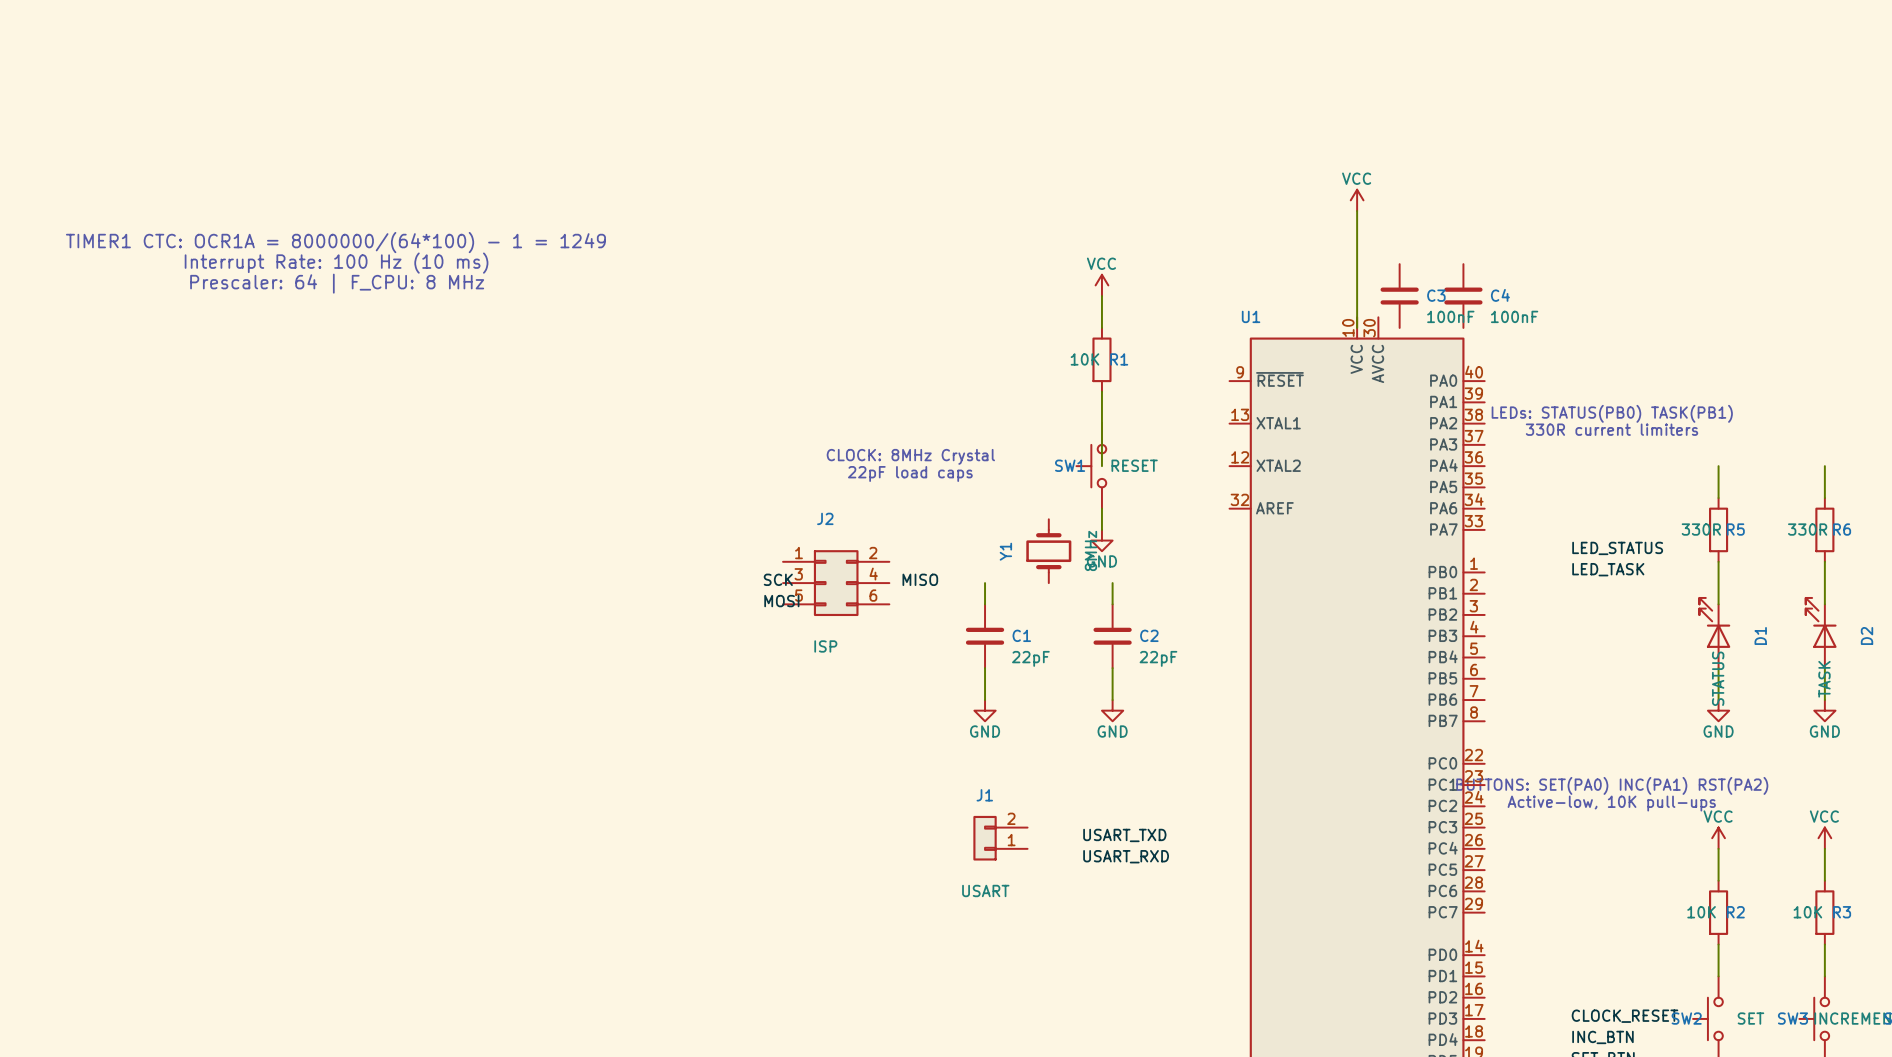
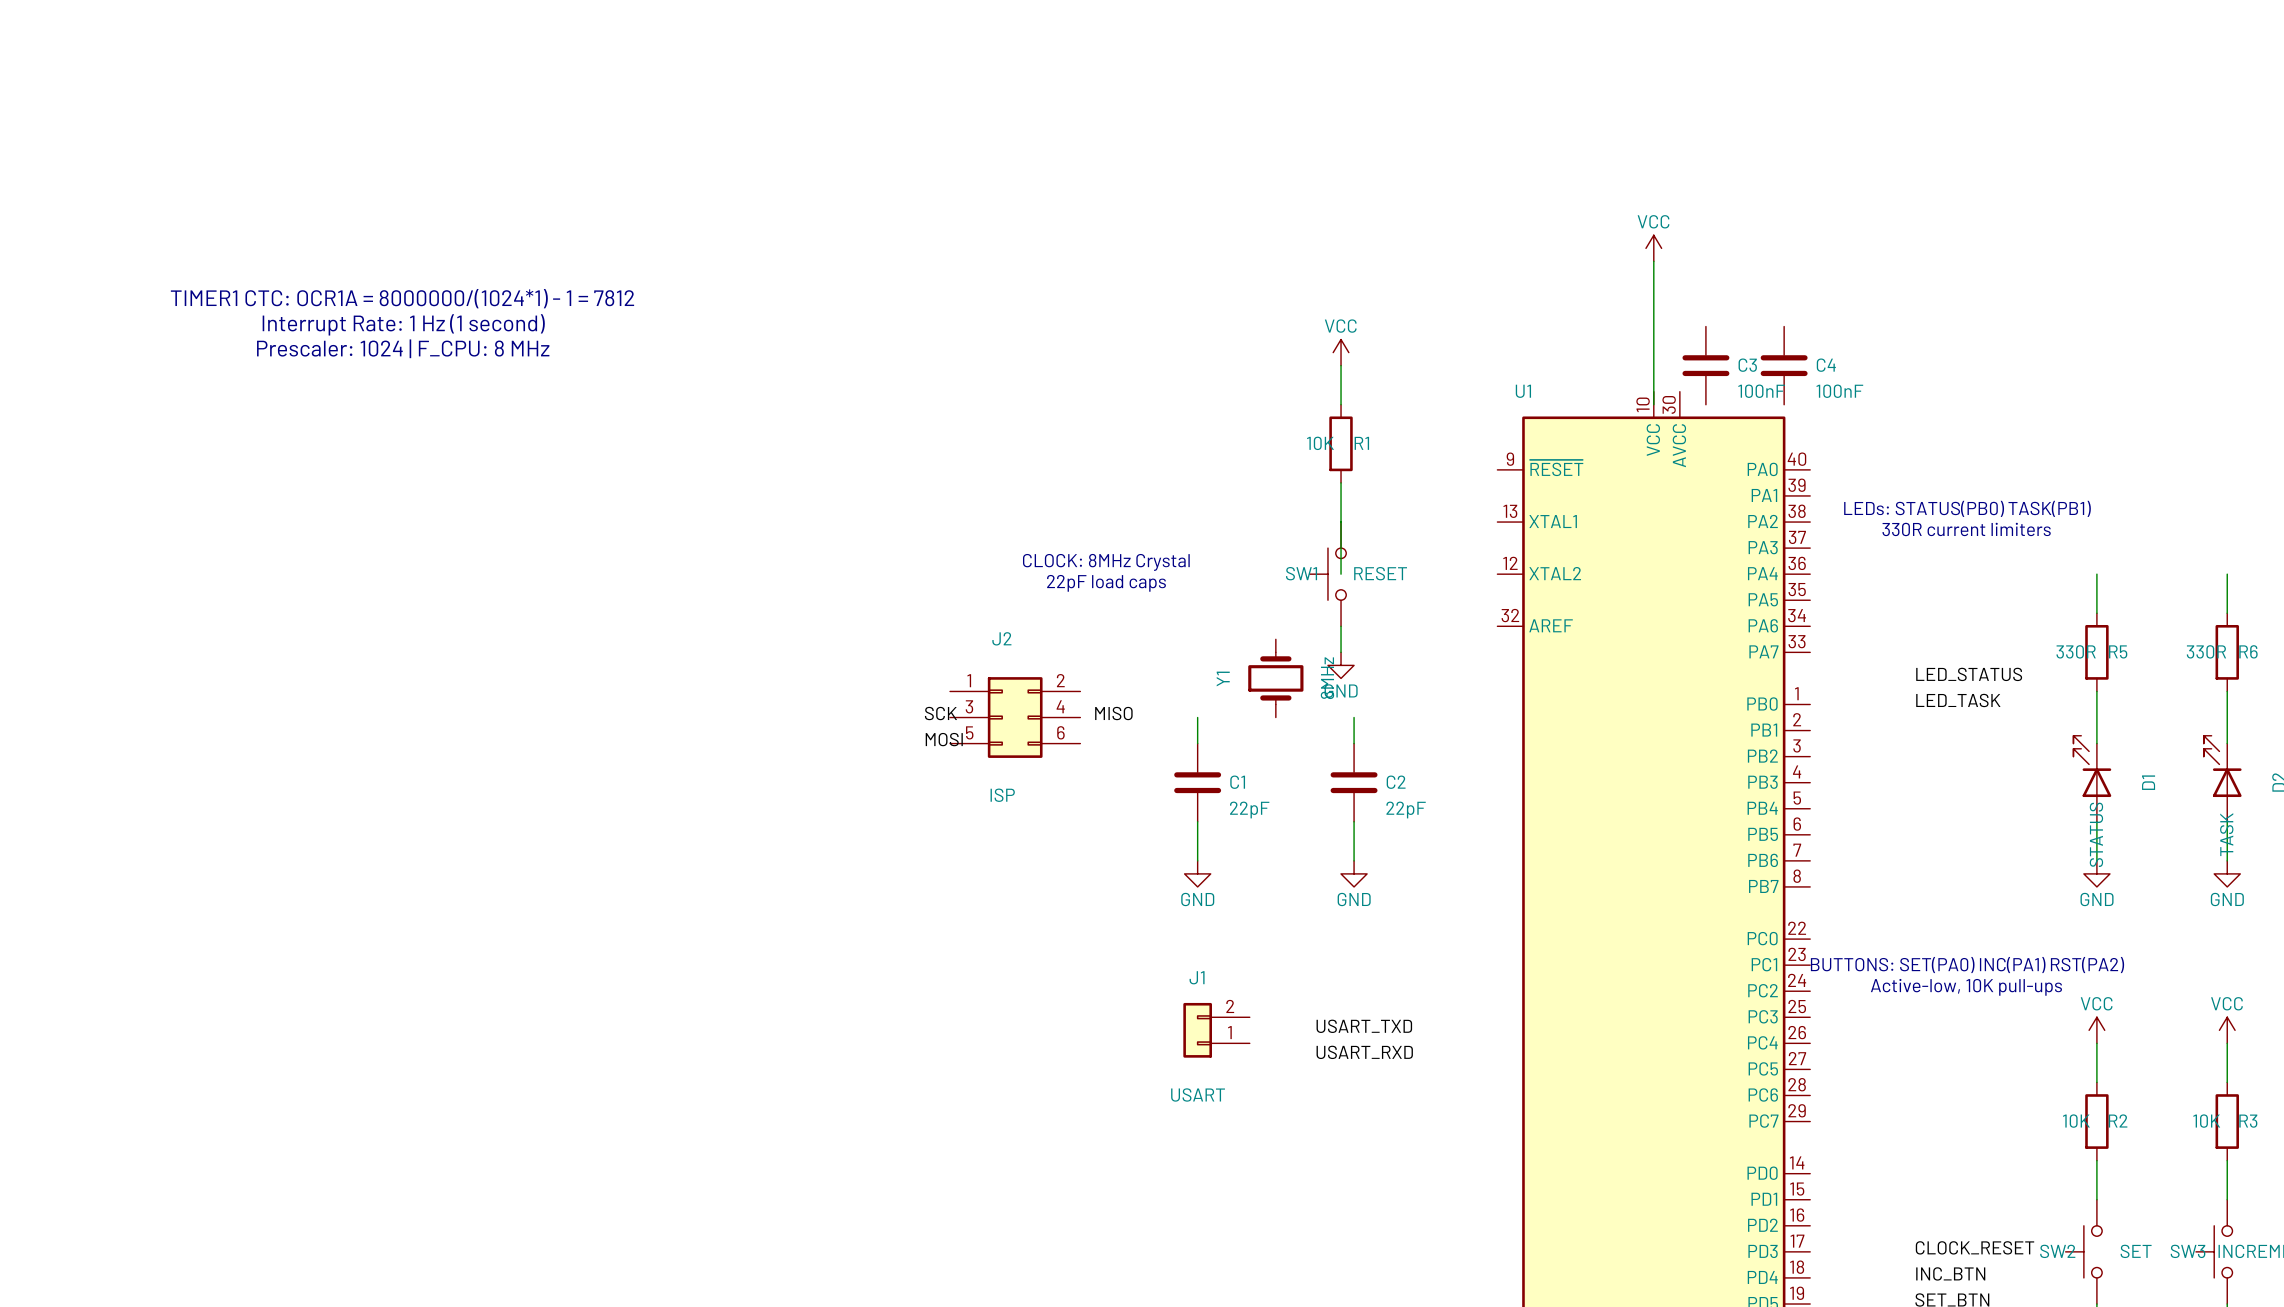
text: TIMER1 CTC: OCR1A = 8000000/(64*100) - 1 = 1249 (335, 242) -> TIMER1 CTC: OCR1A = 8000000/(1024*1) - 1 = 7812 (402, 298)
text: Interrupt Rate: 100 Hz (10 ms) (336, 263) -> Interrupt Rate: 1 Hz (1 second) (403, 324)
text: Prescaler: 64 | F_CPU: 8 MHz (337, 283) -> Prescaler: 1024 | F_CPU: 8 MHz (403, 348)

